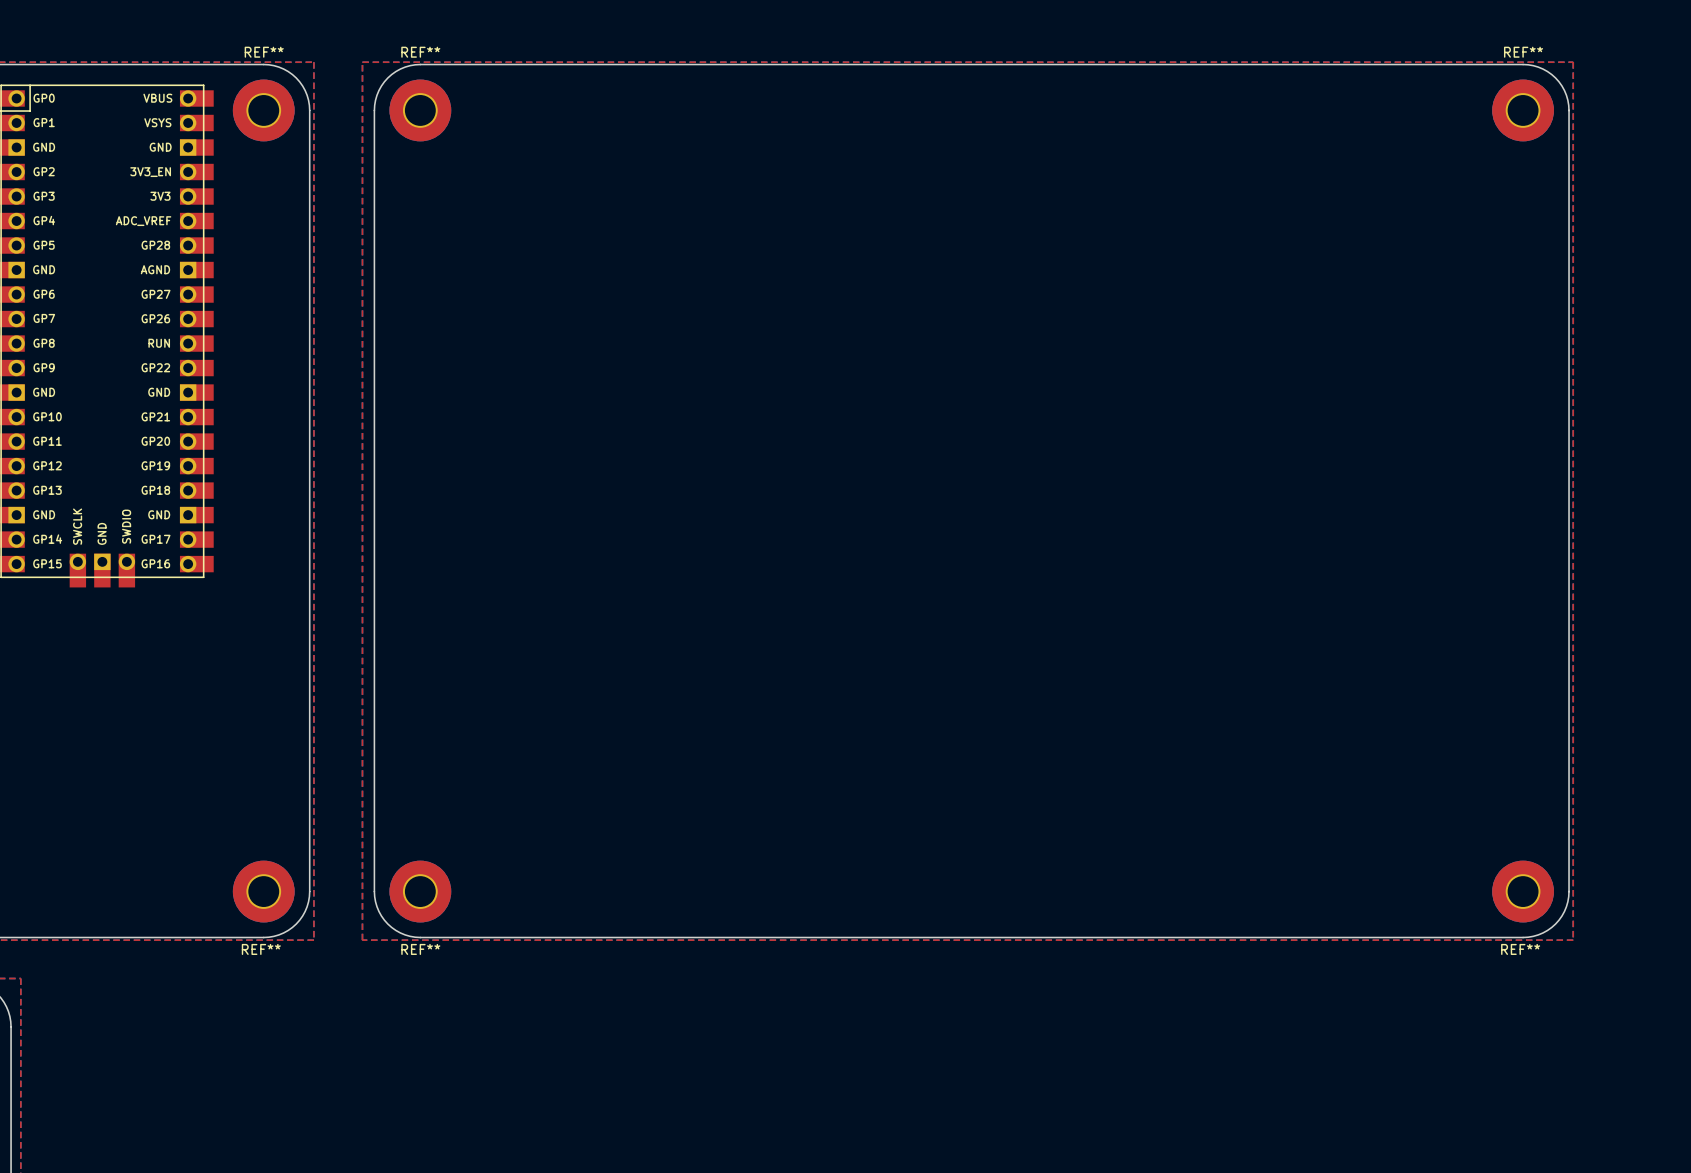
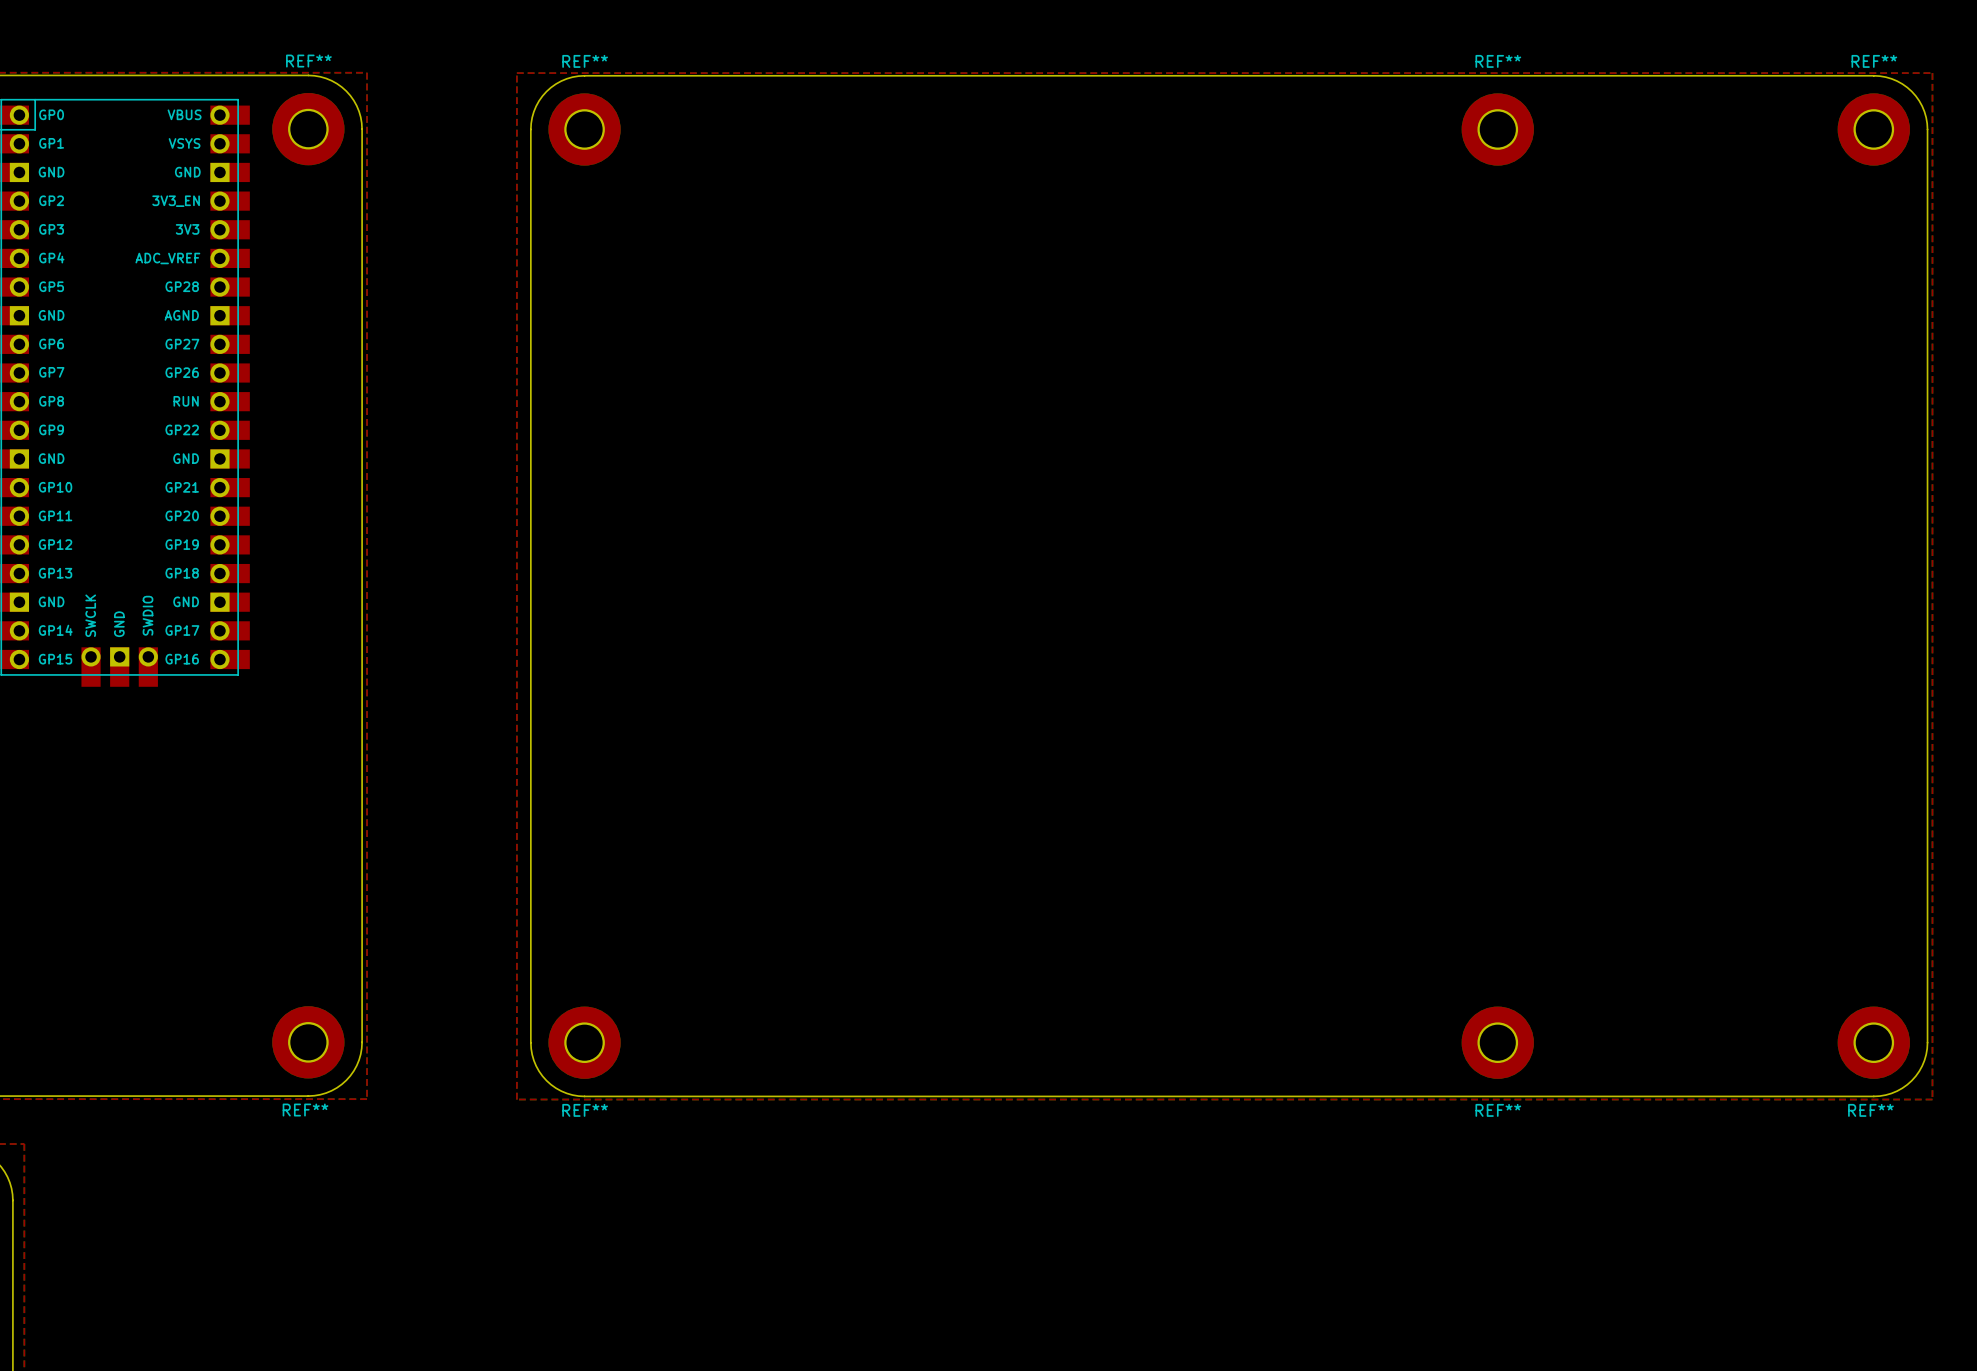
top zone outline: (362, 62) (1573, 62) (1573, 940) (362, 940) (362, 62) -> (516, 73) (1932, 73) (1932, 1099) (516, 1099) (516, 73)
board edge: (420, 64) (1523, 64) (1538, 67) (1551, 74) (1564, 90) (1569, 110) (1569, 891) (1566, 906) (1558, 920) (1543, 932) (1523, 937) (420, 937) (405, 934) (391, 927) (378, 911) (374, 891) (374, 110) (376, 95) (387, 77) (400, 69) (420, 64) -> (584, 75) (1873, 75) (1891, 78) (1907, 87) (1922, 106) (1927, 129) (1927, 1042) (1924, 1060) (1915, 1076) (1897, 1091) (1873, 1096) (584, 1096) (566, 1093) (551, 1084) (536, 1066) (530, 1042) (530, 129) (536, 106) (546, 91) (566, 78) (584, 75)
REF** position: (420, 110) -> (584, 129)
REF**: none -> (1497, 129)
REF** position: (1523, 110) -> (1873, 129)
REF** position: (420, 891) -> (584, 1042)
REF**: none -> (1497, 1042)
REF** position: (1523, 891) -> (1873, 1042)

